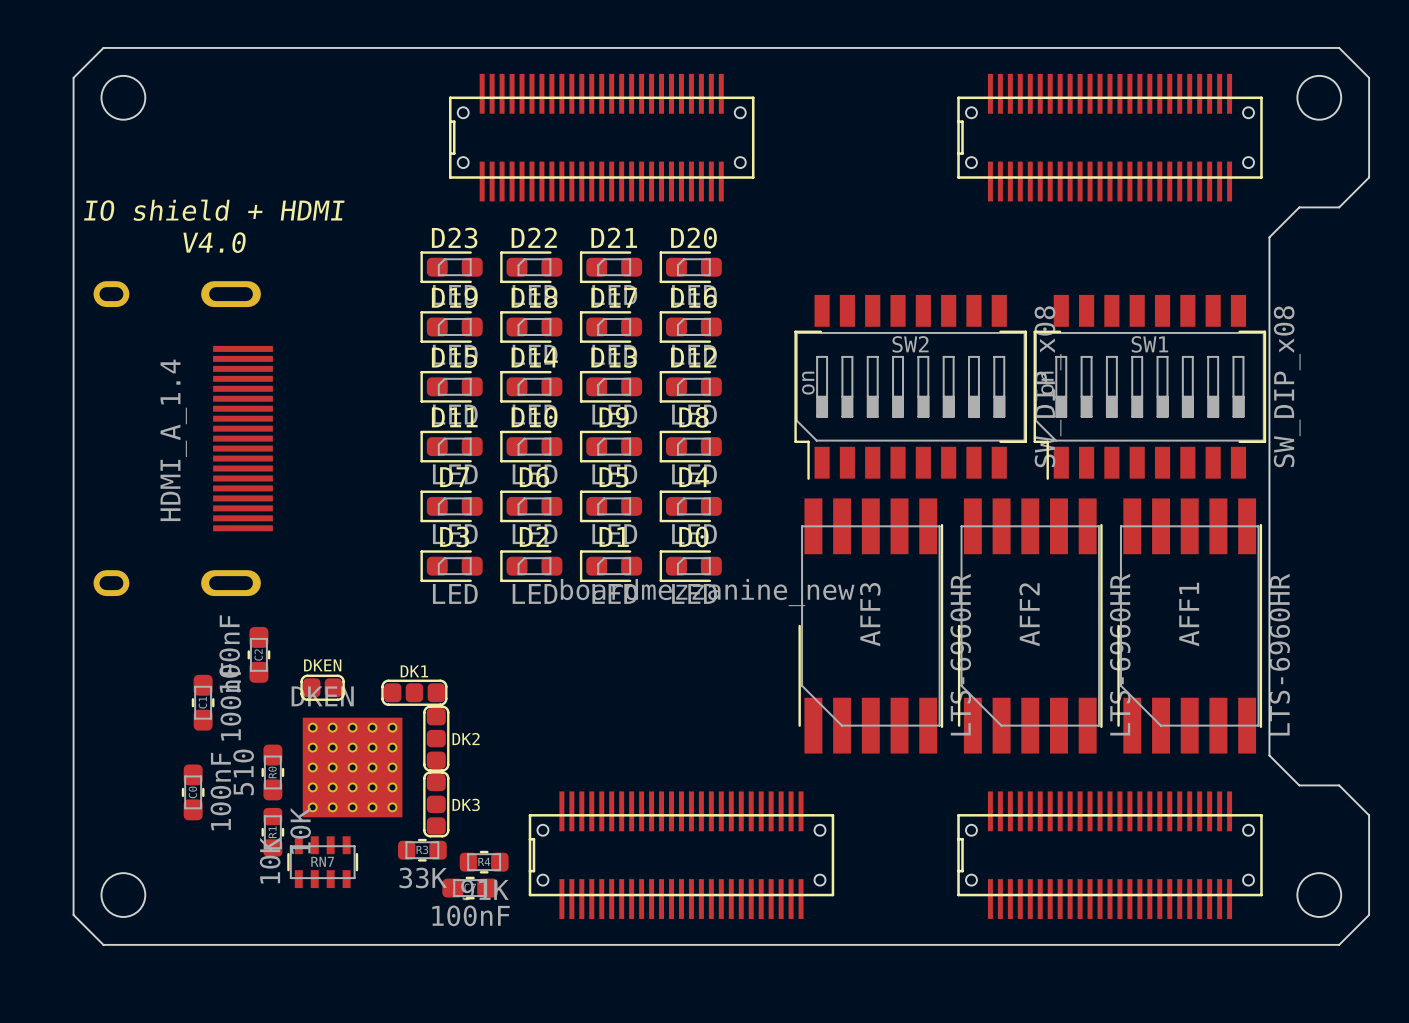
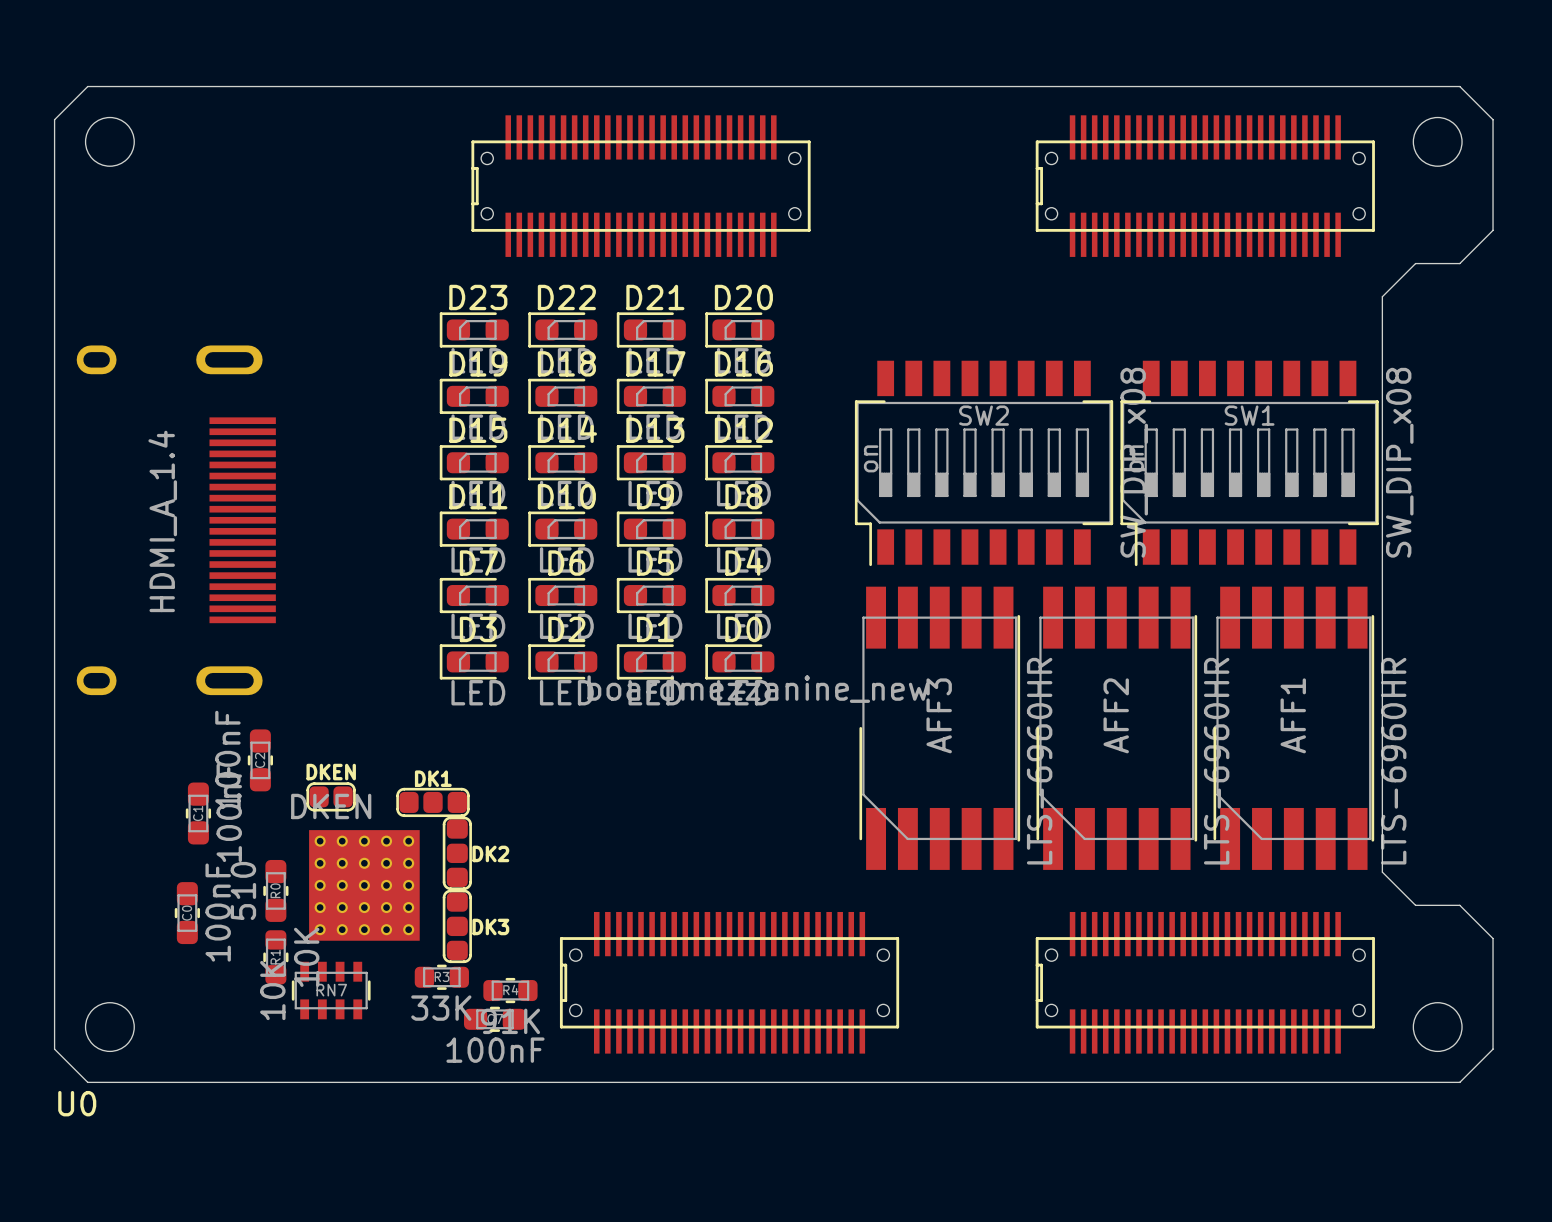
text: IO shield + HDMI (214, 210) -> none
text: V4.0 (214, 242) -> none
U0 name: none -> U0 (77, 1103)

